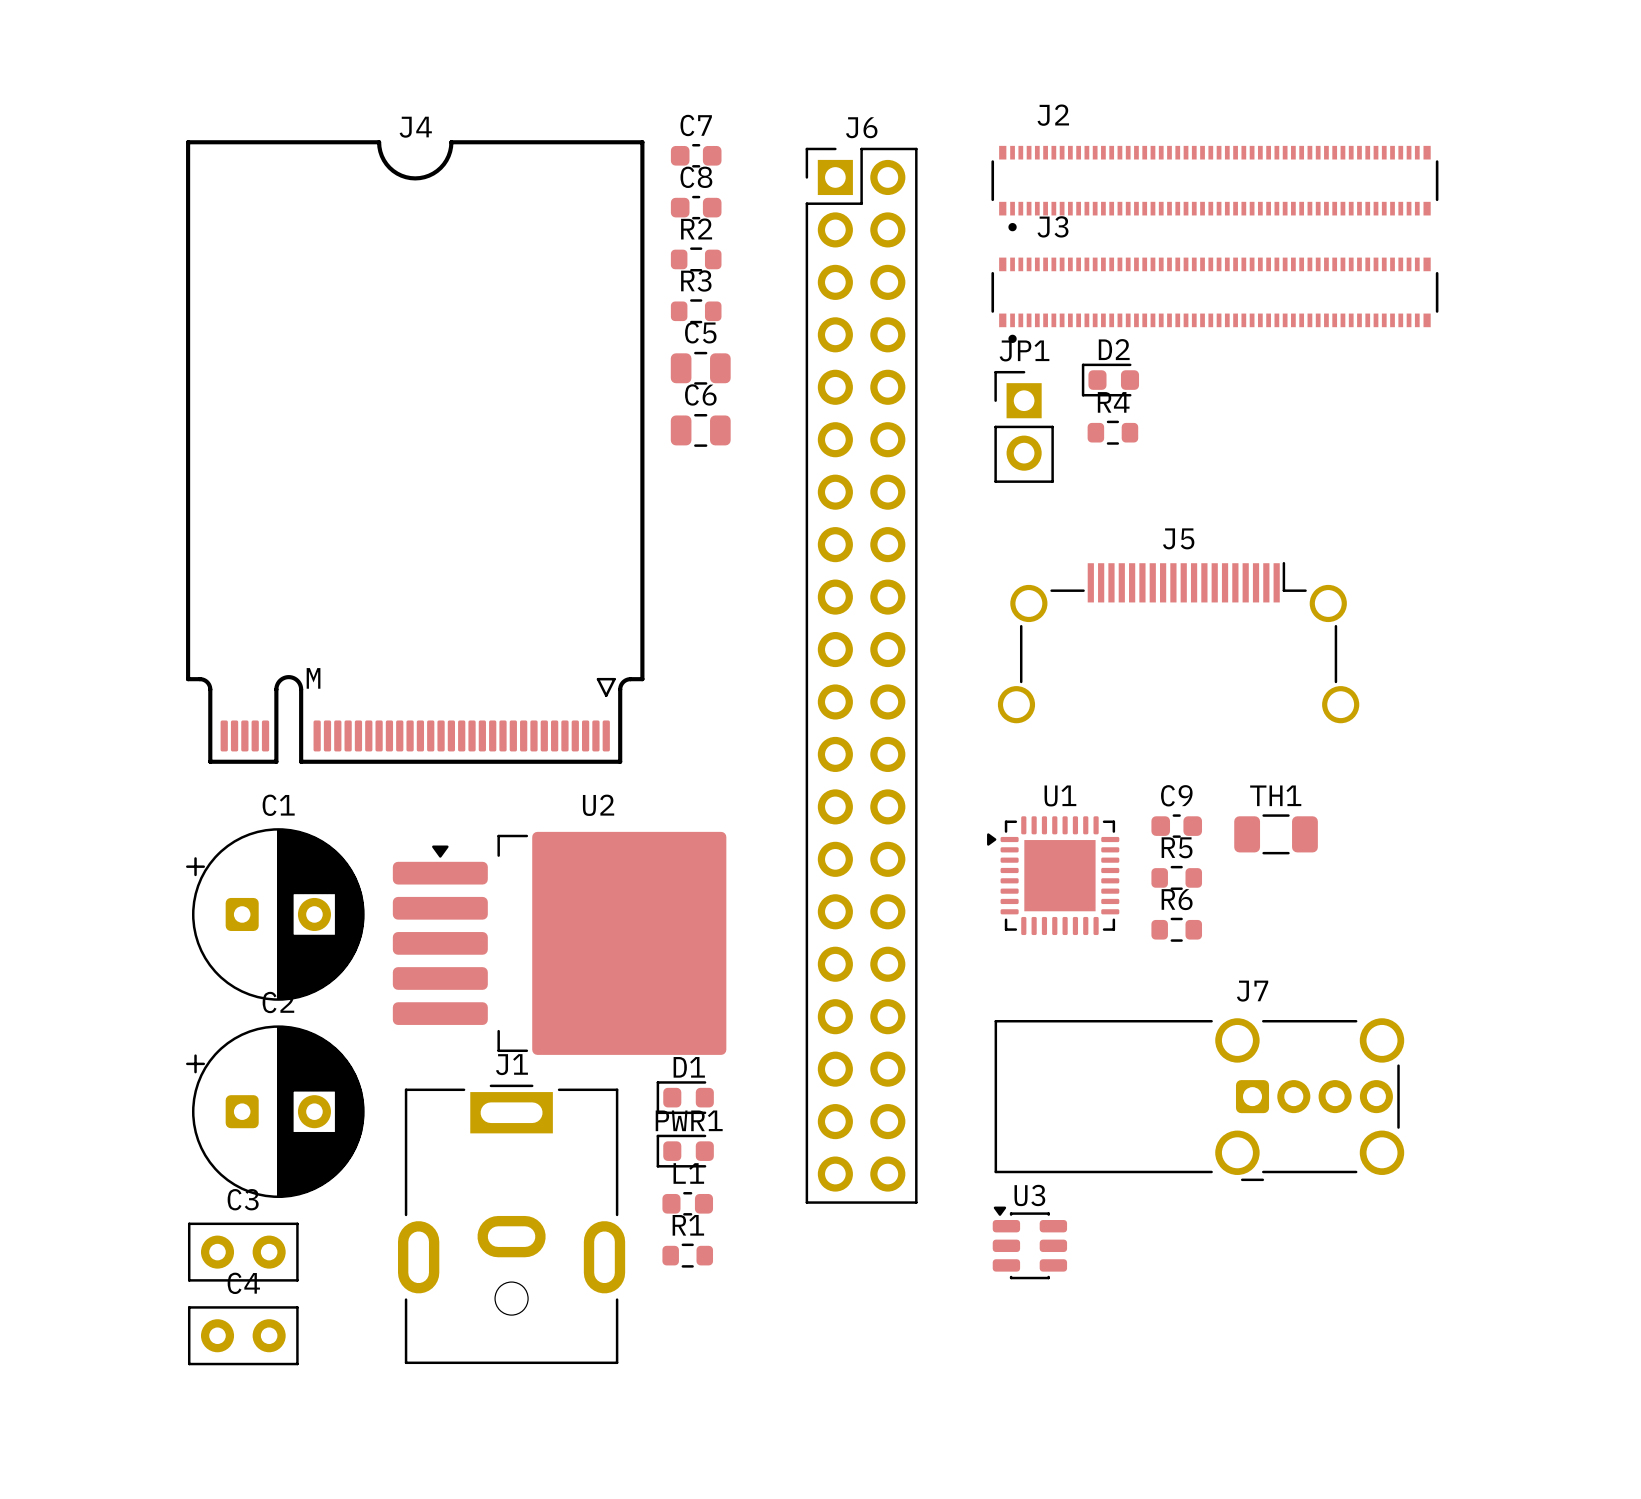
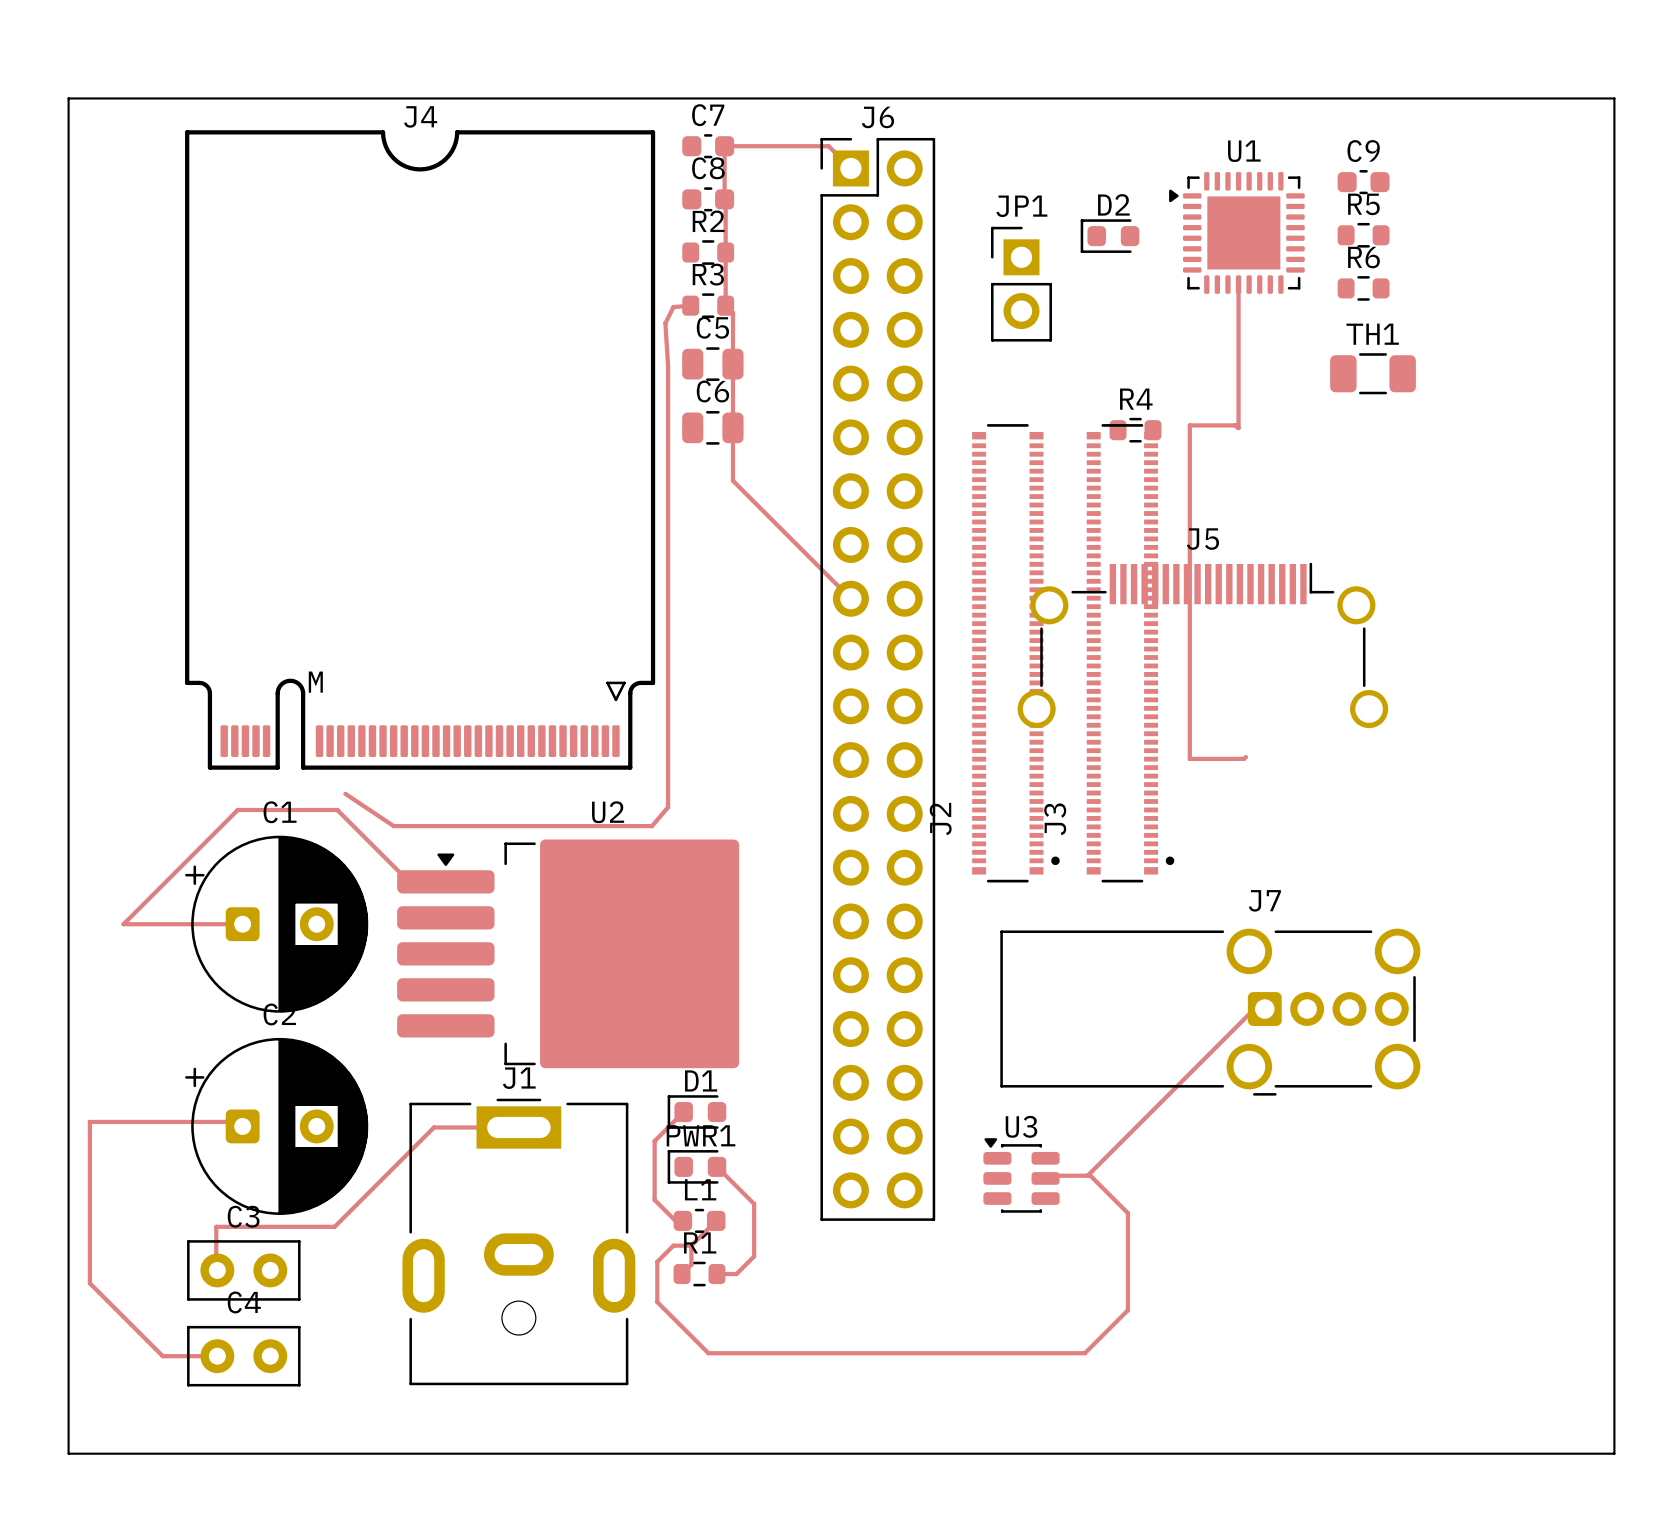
board edge: none -> (68, 98) (68, 1453) (1614, 1453) (1614, 98) (68, 98)
track: none -> (850, 168) (828, 146) (724, 146) (725, 305) (732, 312) (732, 480) (850, 598)
J2 rotation: 0° (1214, 188) -> 90° counterclockwise (1015, 653)
J2 position: (1214, 188) -> (1015, 653)
track: none -> (1238, 284) (1238, 427) (1235, 425) (1189, 425) (1189, 758) (1244, 758) (1245, 757)
J3 rotation: 0° (1214, 300) -> 90° counterclockwise (1130, 653)
J3 position: (1214, 300) -> (1130, 653)
track: none -> (690, 305) (673, 307) (665, 323) (668, 366) (668, 807) (651, 826) (393, 826) (345, 793)
D2 position: (1110, 380) -> (1110, 236)
JP1 position: (1024, 426) -> (1021, 284)
C9 position: (1176, 826) -> (1363, 182)
TH1 position: (1276, 834) -> (1373, 373)
track: none -> (445, 881) (409, 881) (337, 809) (237, 809) (123, 924) (242, 924)
U1 position: (1053, 875) -> (1236, 232)
R5 position: (1176, 877) -> (1363, 235)
R6 position: (1176, 929) -> (1363, 288)
track: none -> (1264, 1009) (1254, 1009) (1087, 1175)
track: none -> (683, 1112) (654, 1141) (654, 1199) (675, 1220) (682, 1220)
J7 position: (1199, 1099) -> (1210, 1012)
track: none -> (242, 1126) (238, 1121) (89, 1121) (89, 1283) (162, 1356) (217, 1356)
track: none -> (518, 1127) (433, 1127) (334, 1226) (216, 1226) (217, 1270)
track: none -> (717, 1166) (754, 1203) (754, 1256) (736, 1274) (716, 1274)
track: none -> (1045, 1178) (1048, 1175) (1090, 1175) (1127, 1213) (1127, 1310) (1084, 1353) (708, 1353) (657, 1302) (657, 1261) (673, 1245) (691, 1245)
track: none -> (716, 1220) (691, 1245)
track: none -> (691, 1245) (691, 1264) (682, 1274)
U3 position: (1029, 1242) -> (1021, 1175)

